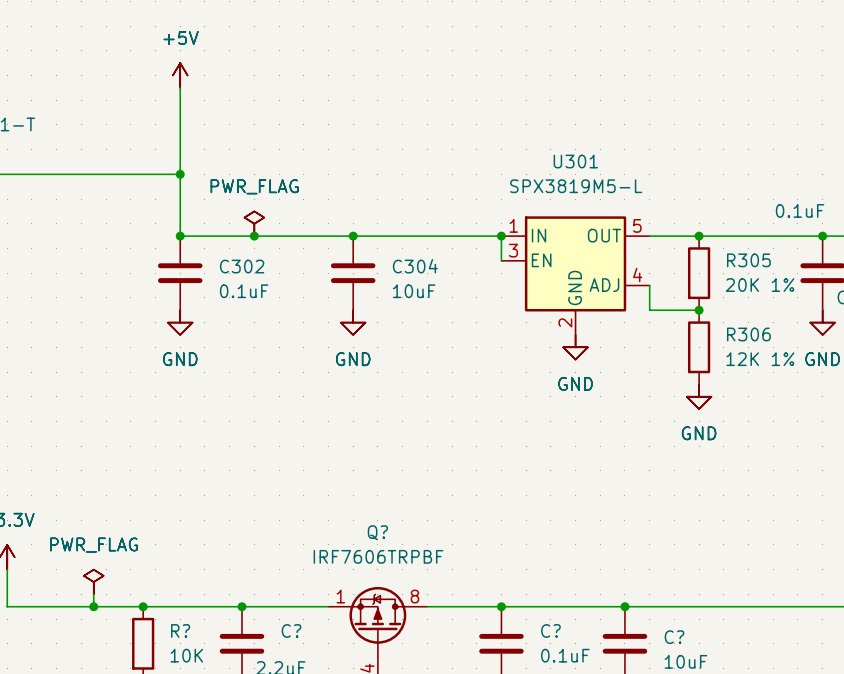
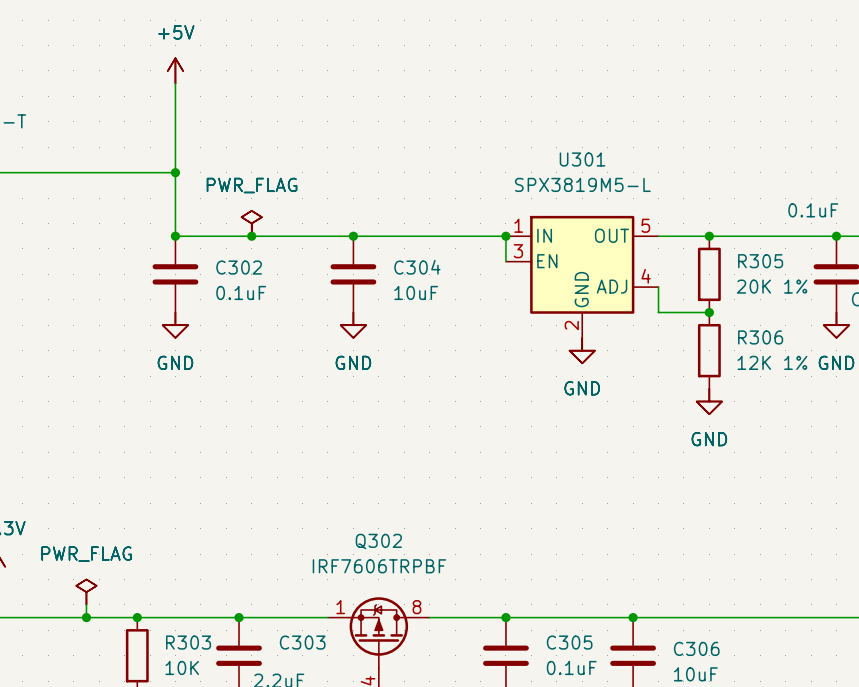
Q? name: Q? (377, 532) -> Q302 (378, 541)
R? name: R? (180, 630) -> R303 (188, 642)
C? name: C? (291, 630) -> C303 (302, 642)
C? name: C? (550, 630) -> C305 (569, 642)
C? name: C? (674, 637) -> C306 (696, 648)

